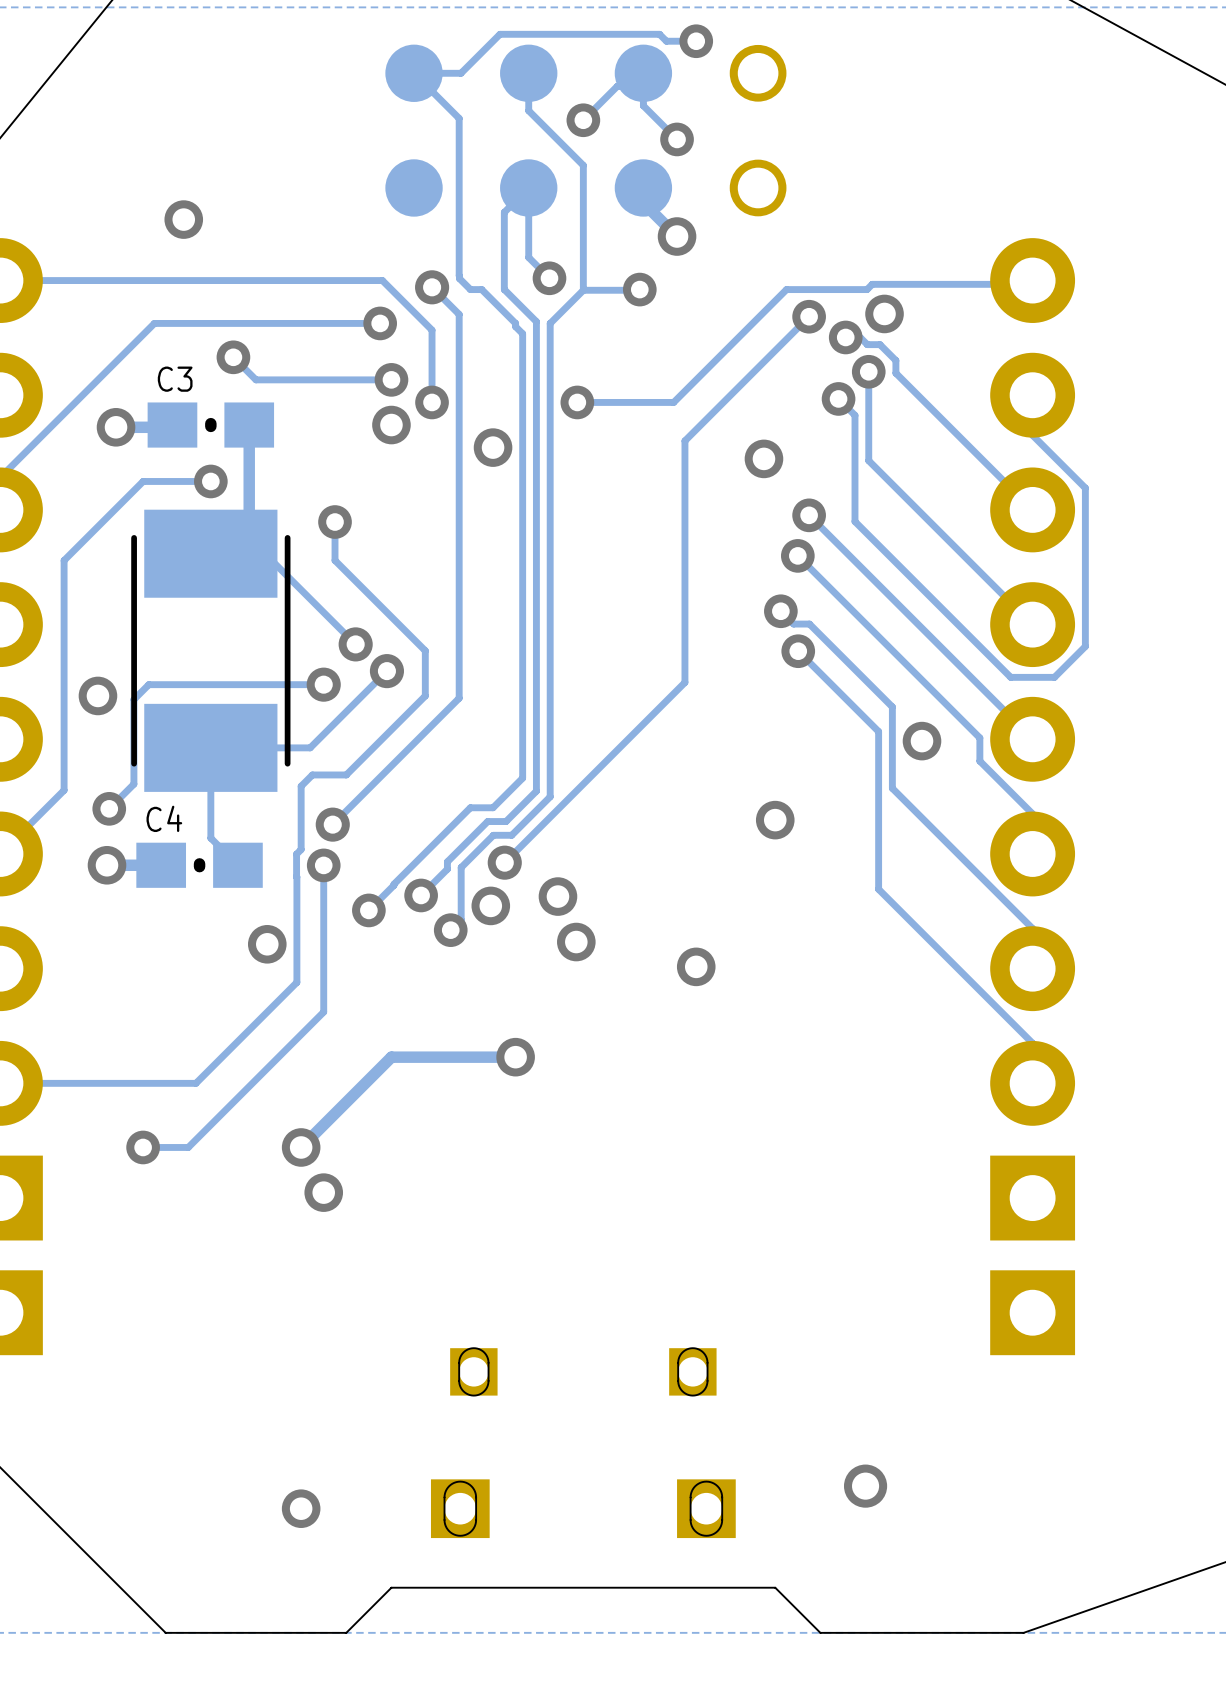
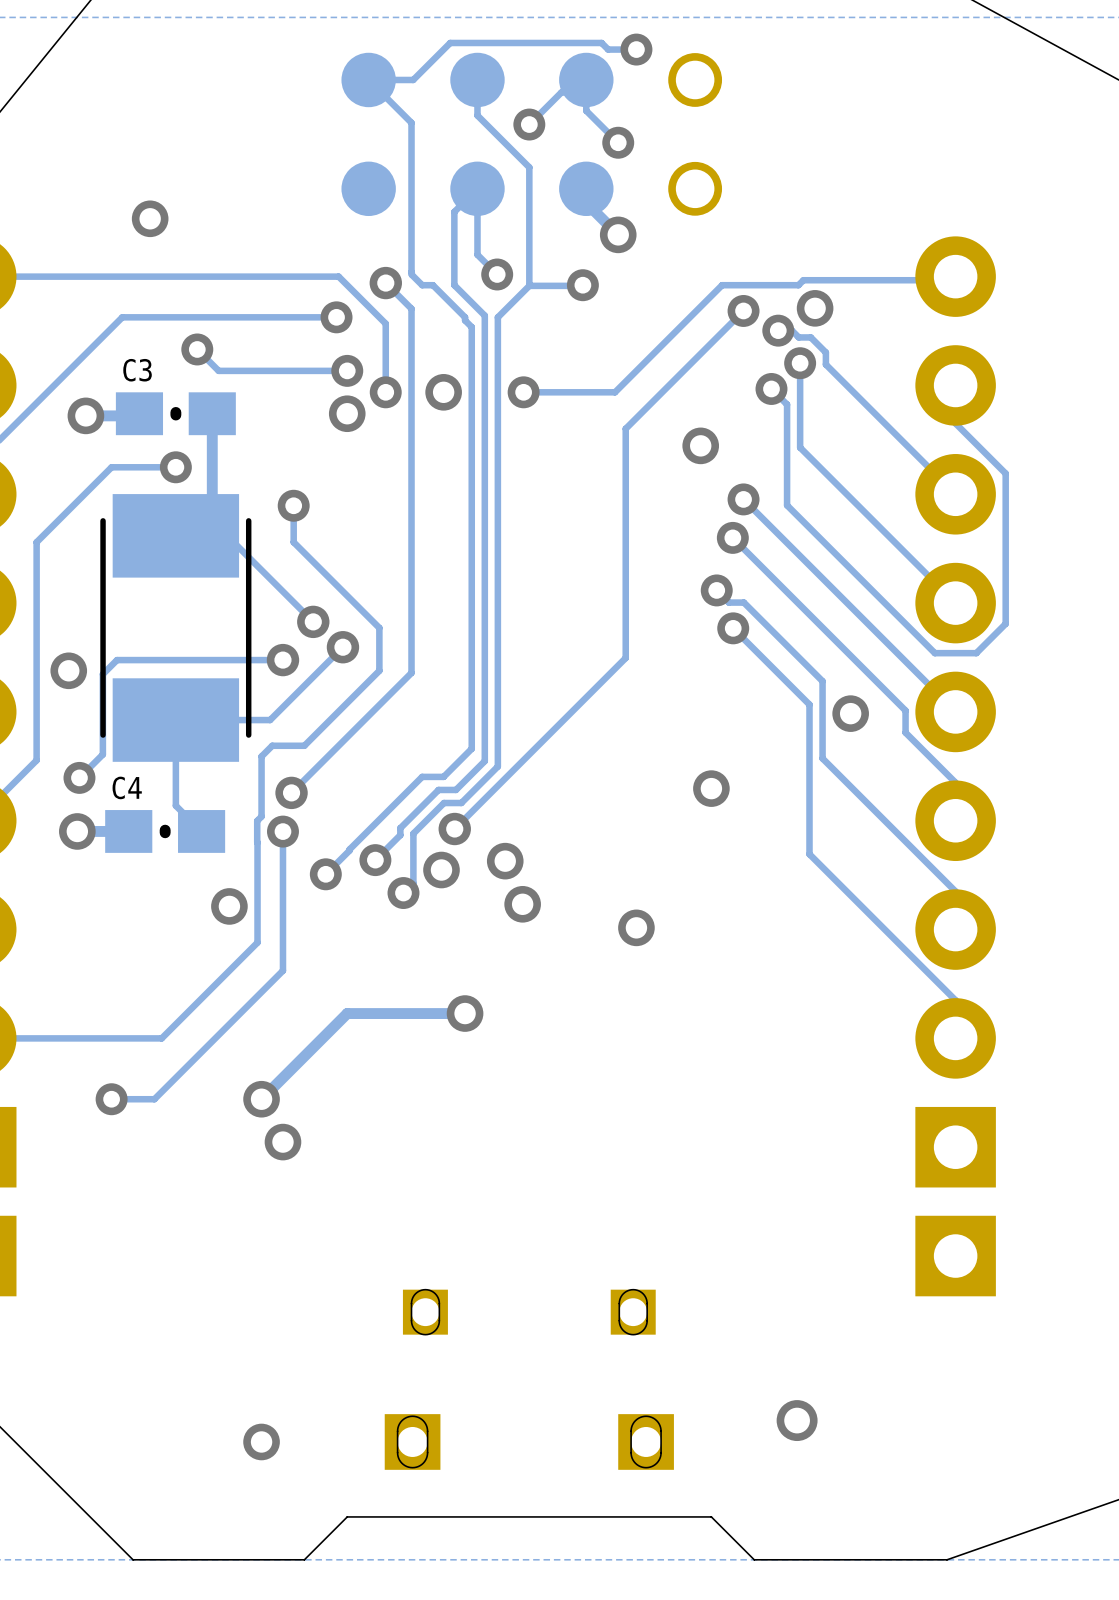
via position: (493, 447) -> (443, 392)

